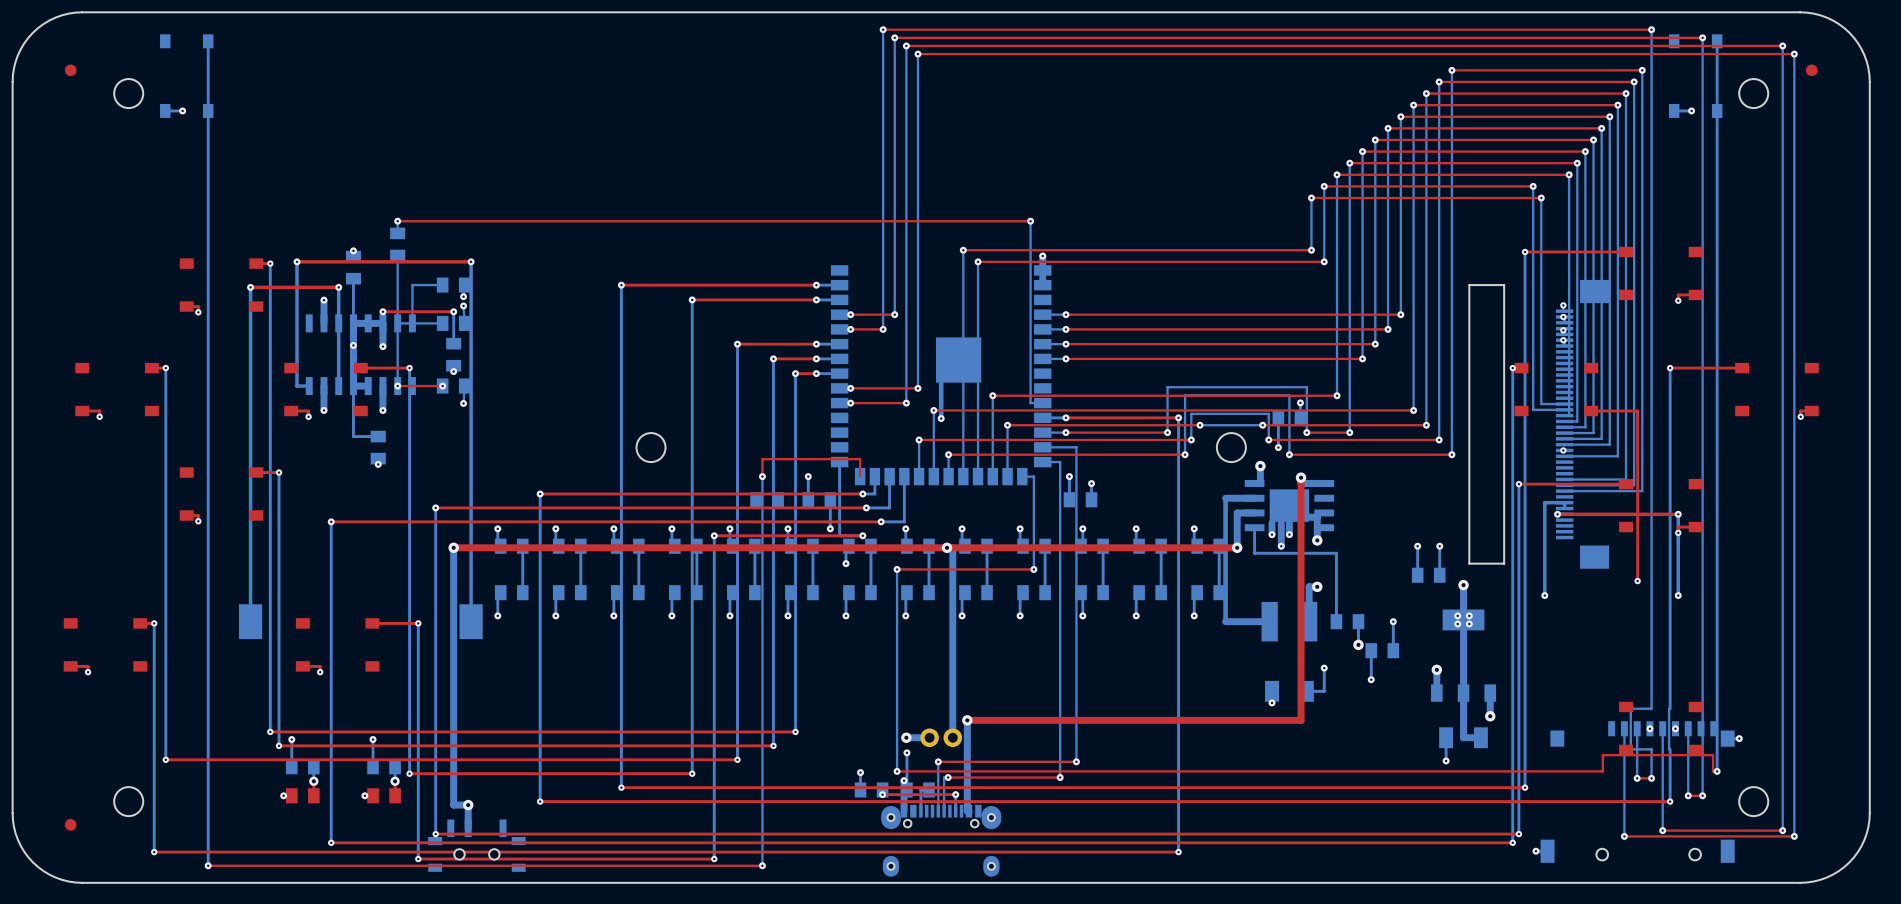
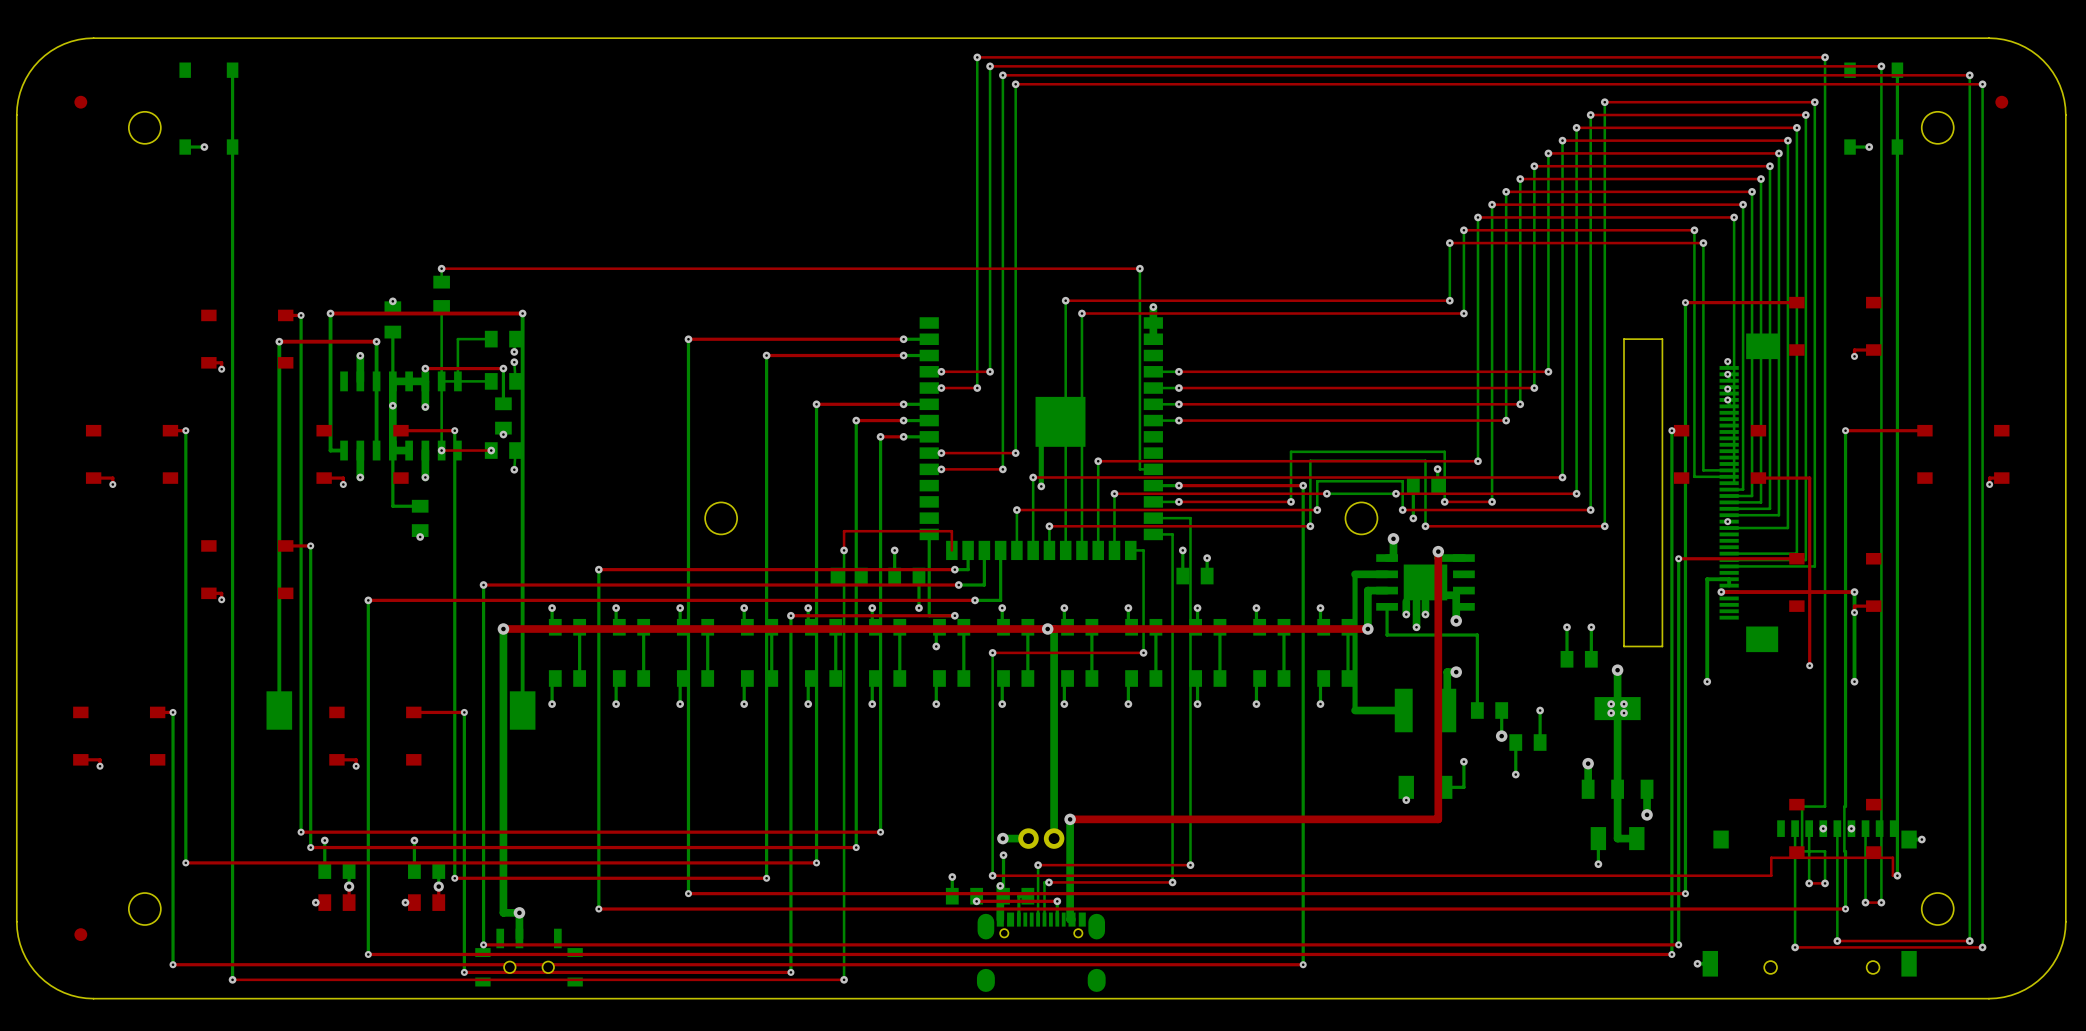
part footprint: [881, 804, 1002, 877] -> [976, 912, 1106, 992]

